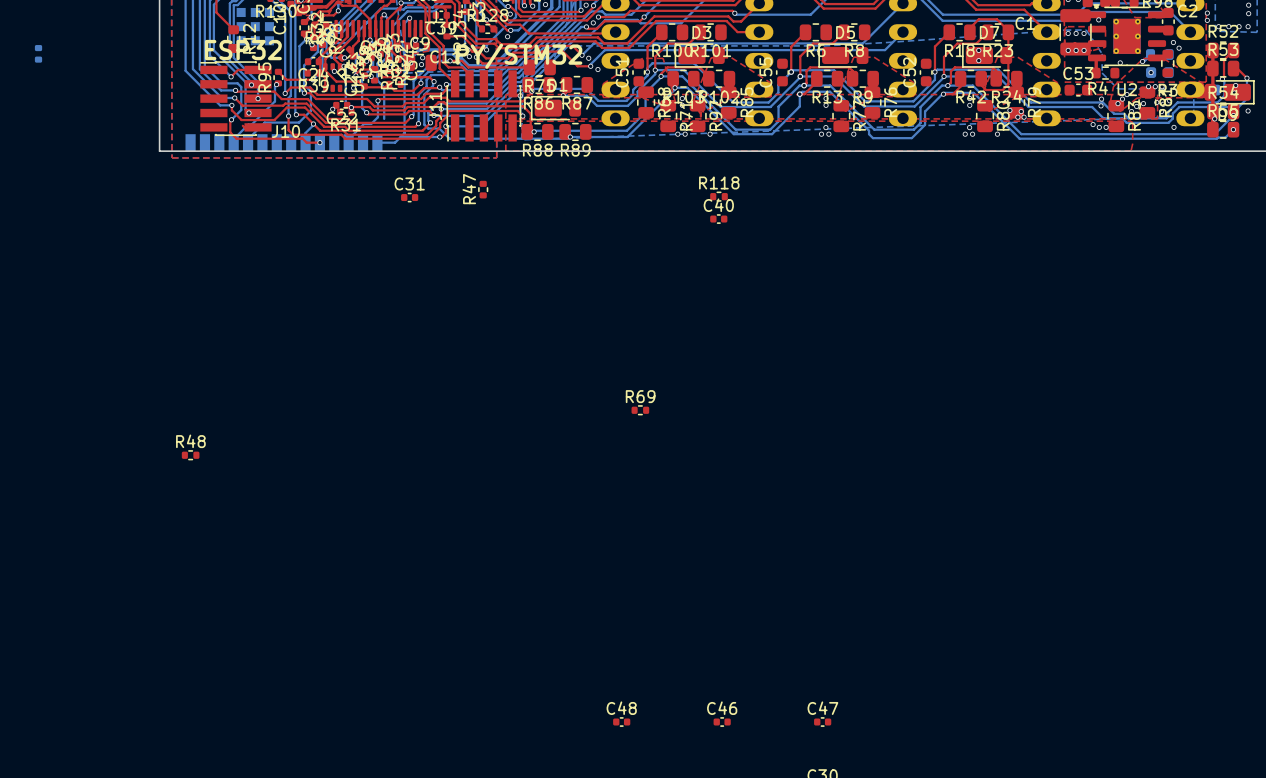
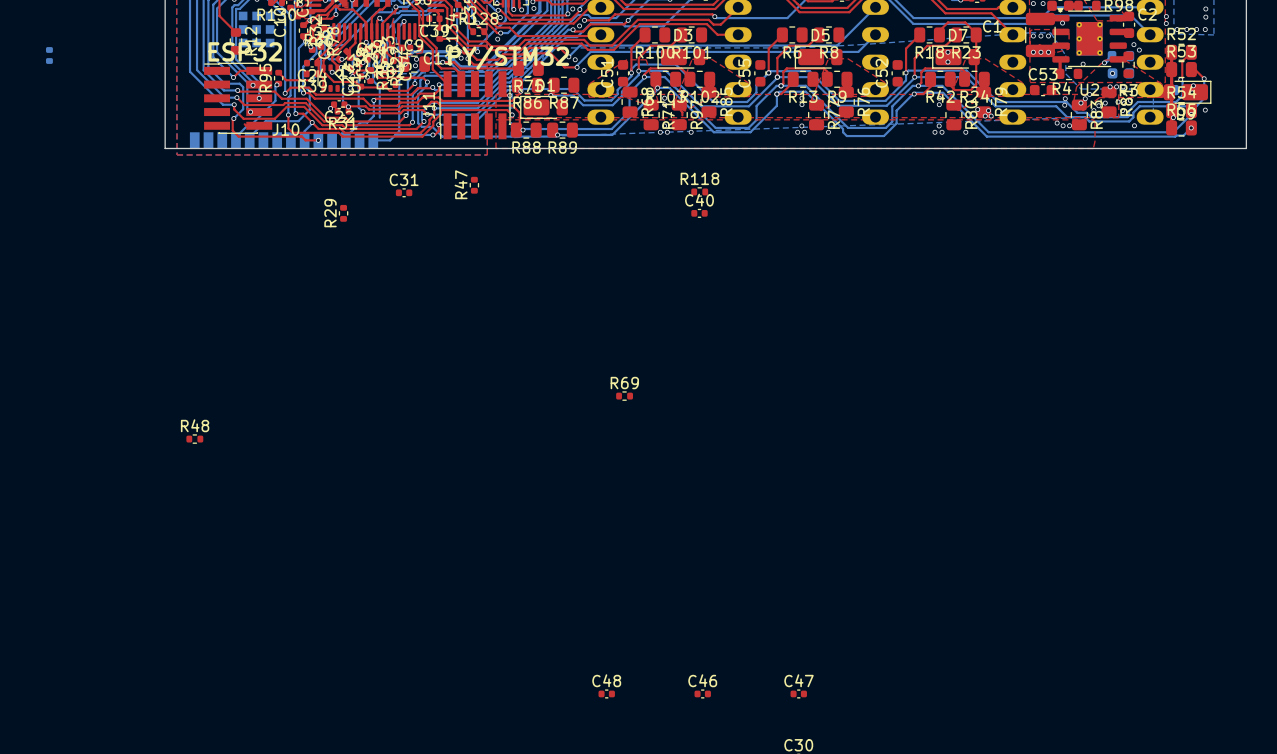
R29: none -> (343, 213)

